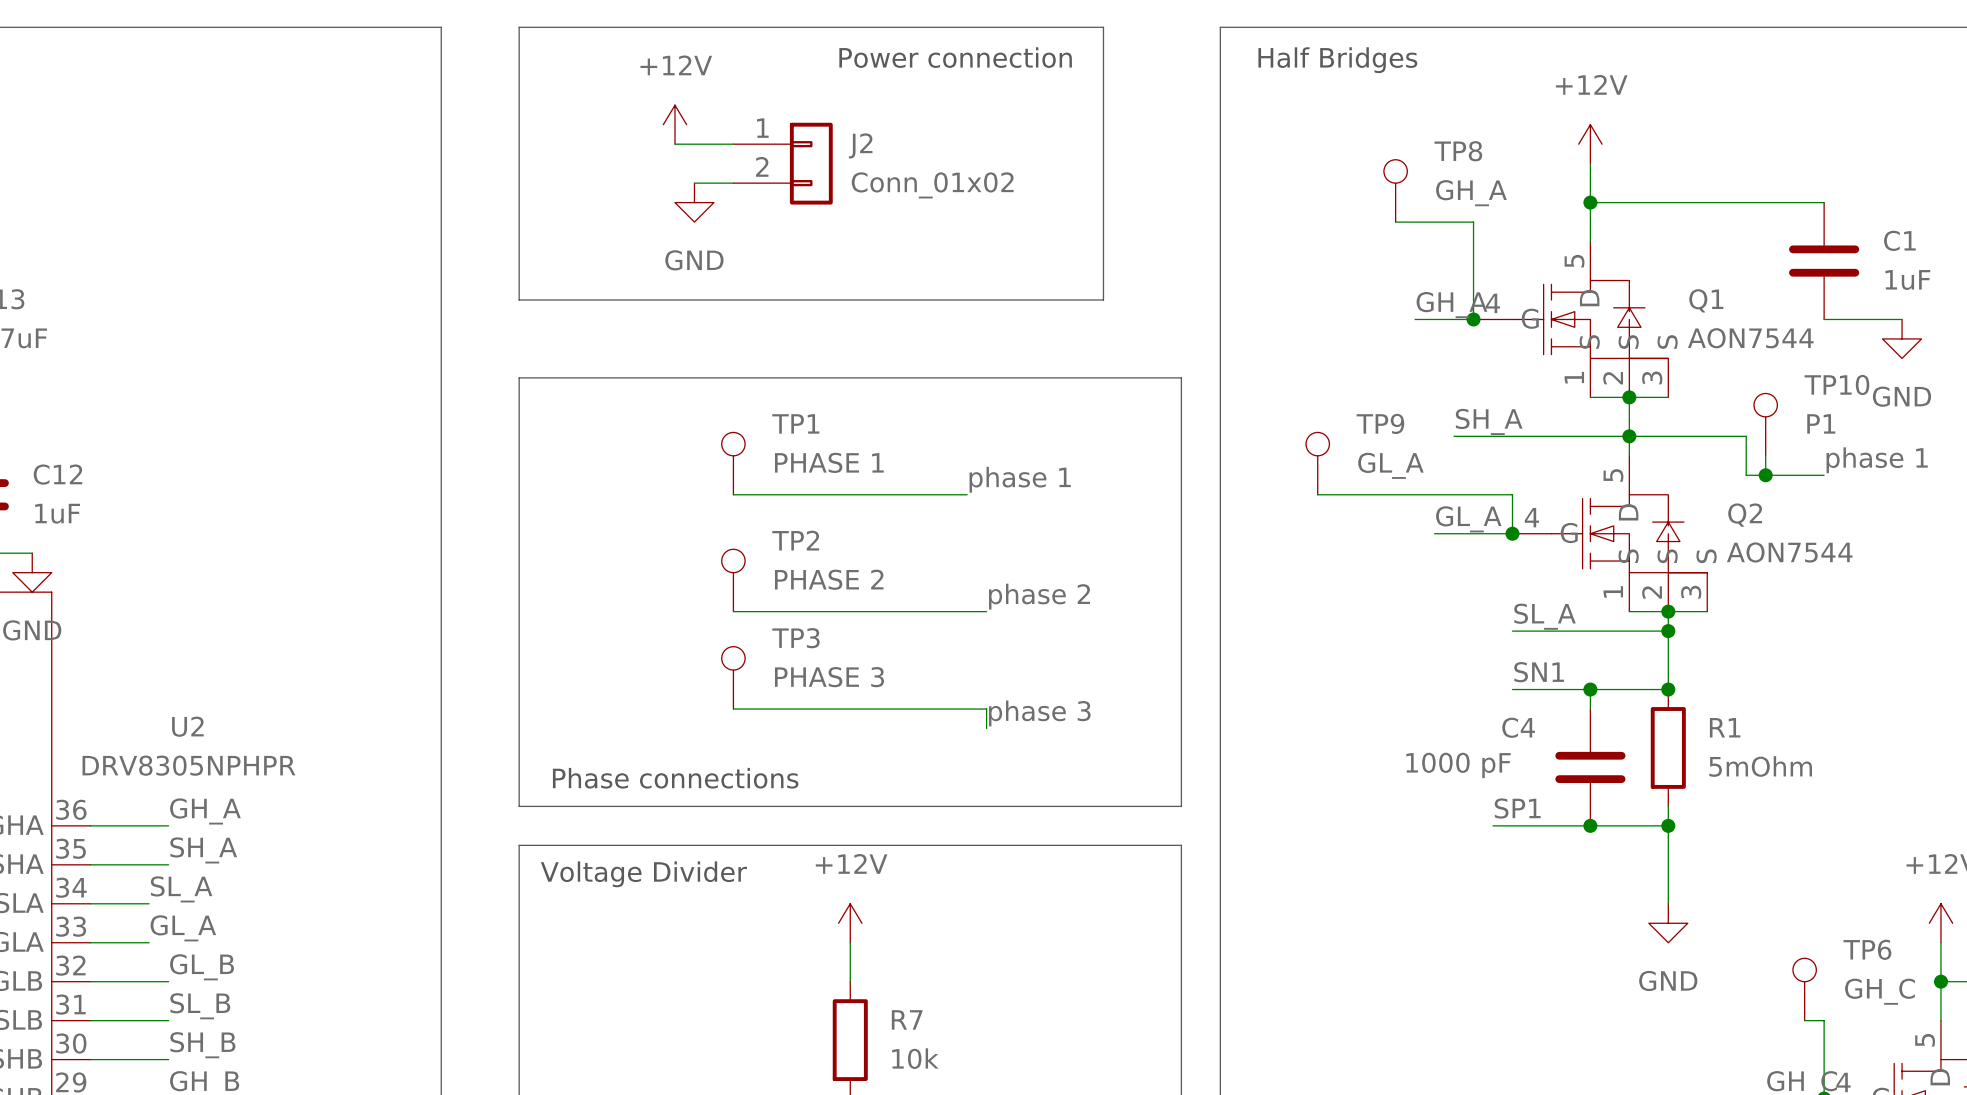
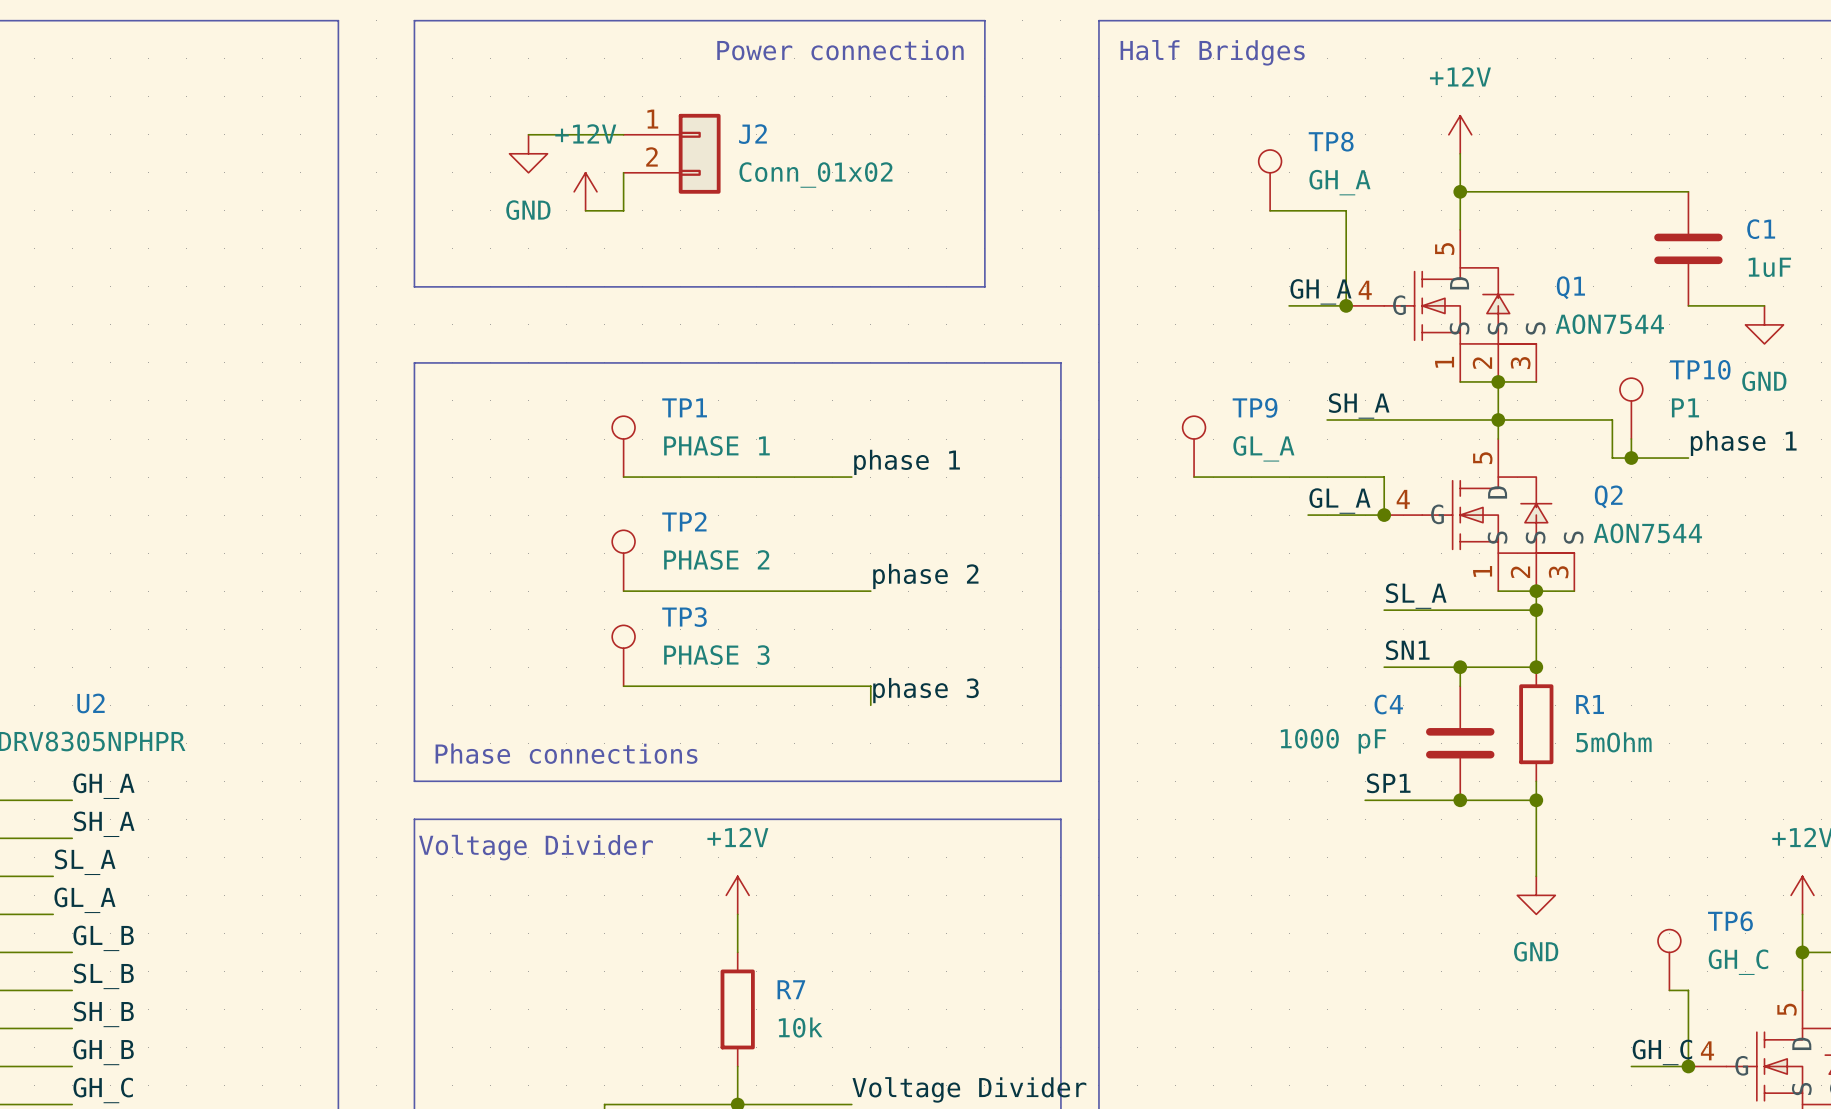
power symbol: +12V (674, 124) -> none
wire: none -> (528, 134) (566, 134)
power symbol: none -> GND (528, 153)
wire: (694, 183) (733, 183) -> (585, 210) (623, 210) (623, 172)
power symbol: GND (694, 202) -> +12V (585, 191)

